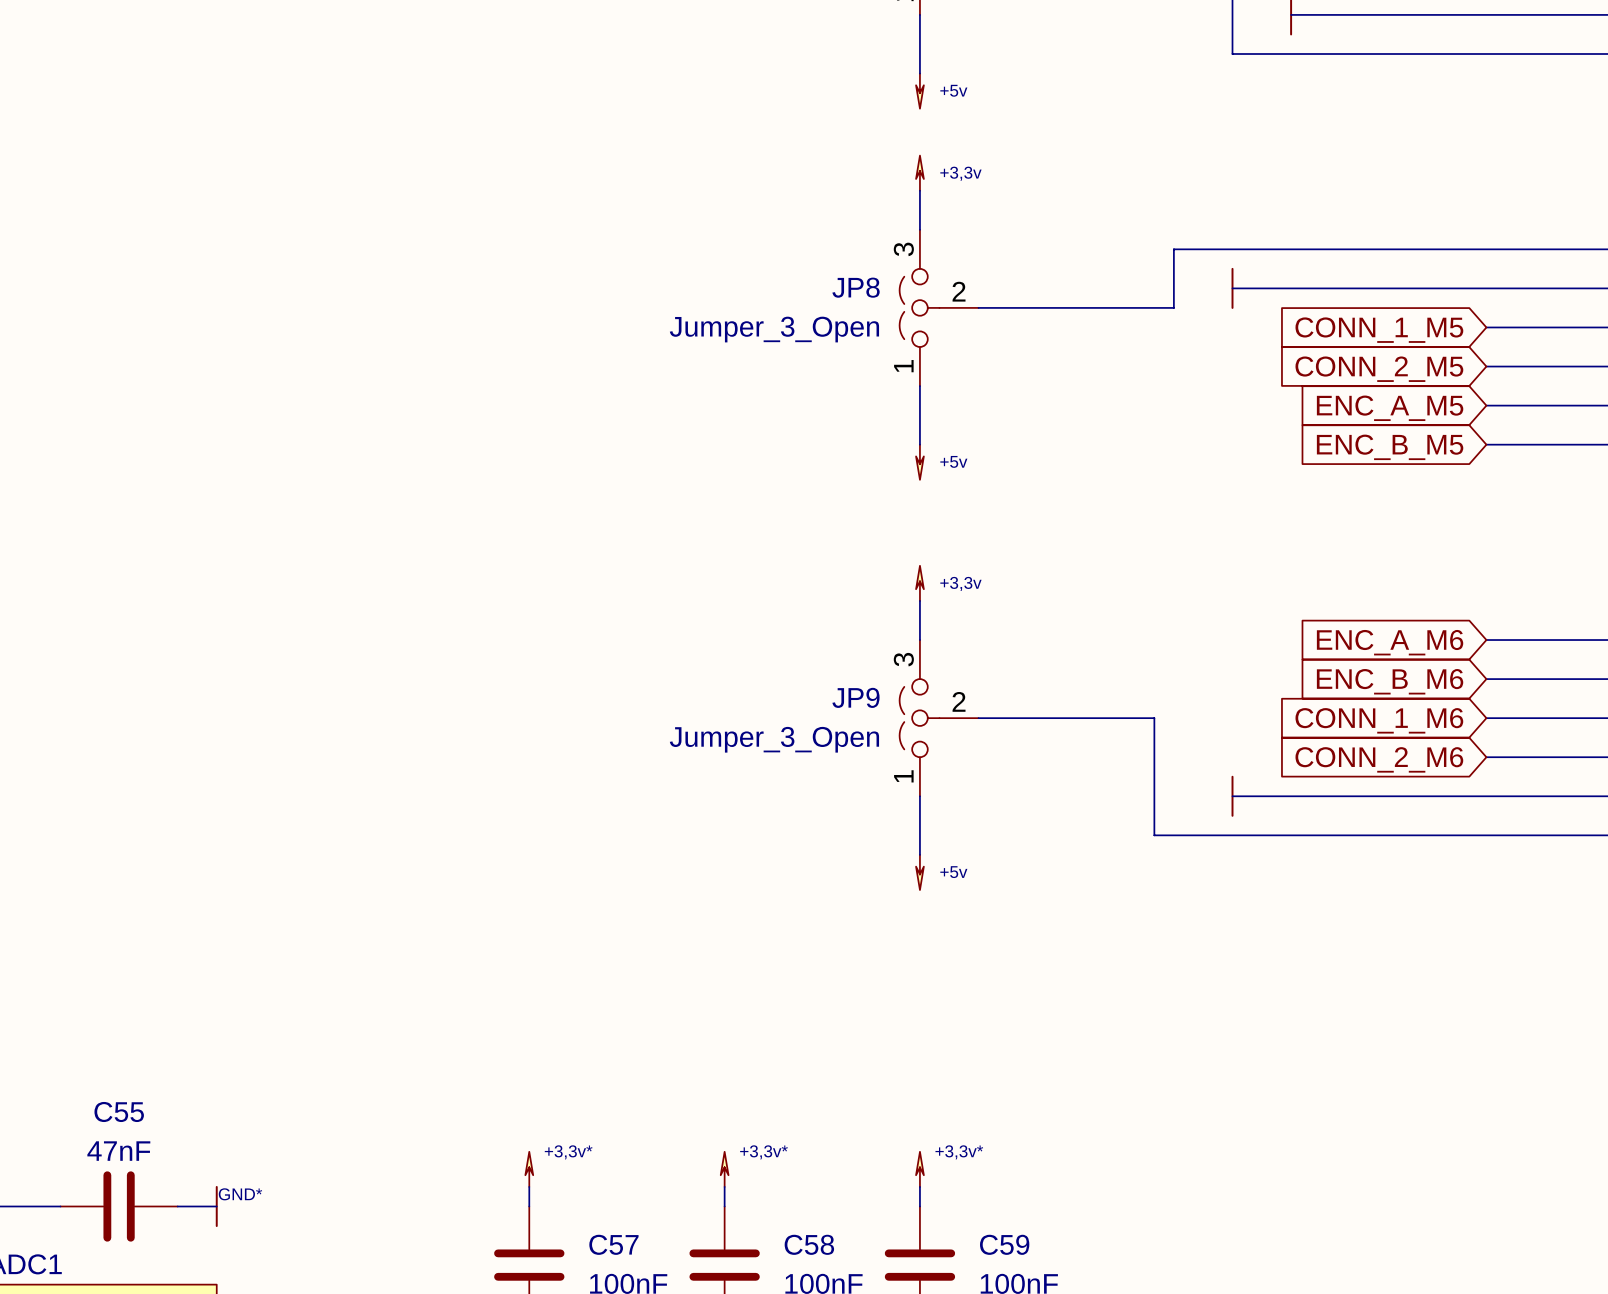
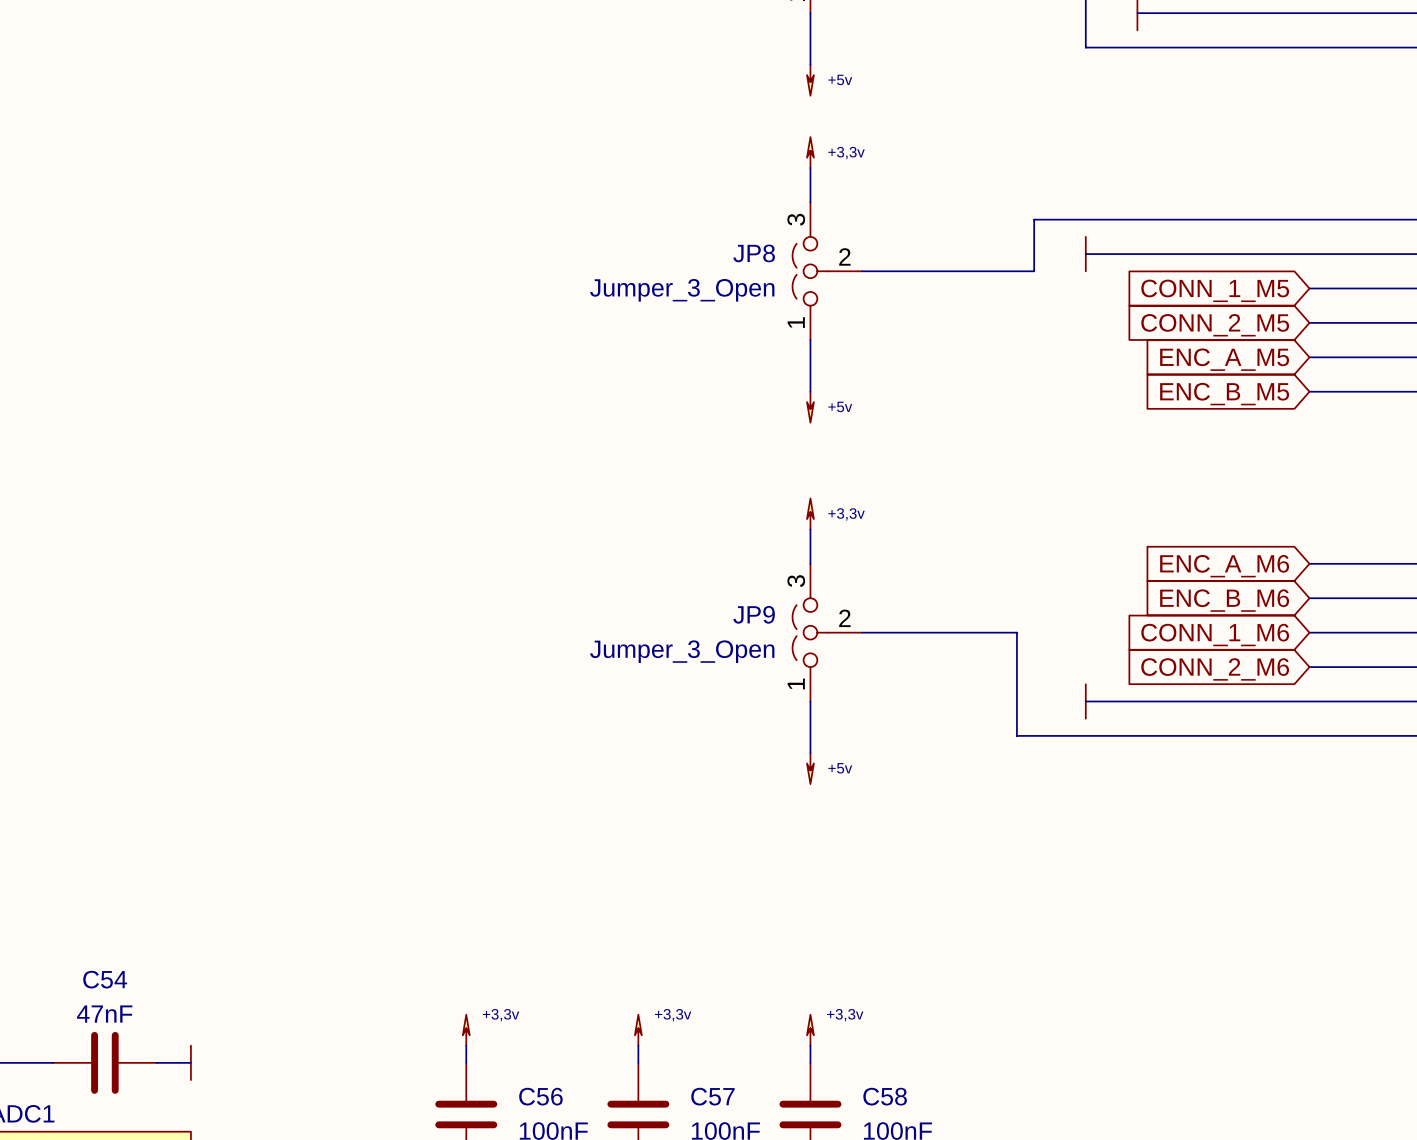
C55 name: C55 (119, 1111) -> C54 (105, 979)
power symbol: +3,3v* (529, 1169) -> +3,3v (466, 1030)
power symbol: +3,3v* (724, 1169) -> +3,3v (638, 1030)
power symbol: +3,3v* (919, 1169) -> +3,3v (810, 1030)
power symbol text: GND* (240, 1194) -> none
C57 name: C57 (613, 1244) -> C56 (540, 1096)
C58 name: C58 (809, 1244) -> C57 (712, 1096)
C59 name: C59 (1004, 1244) -> C58 (885, 1096)

